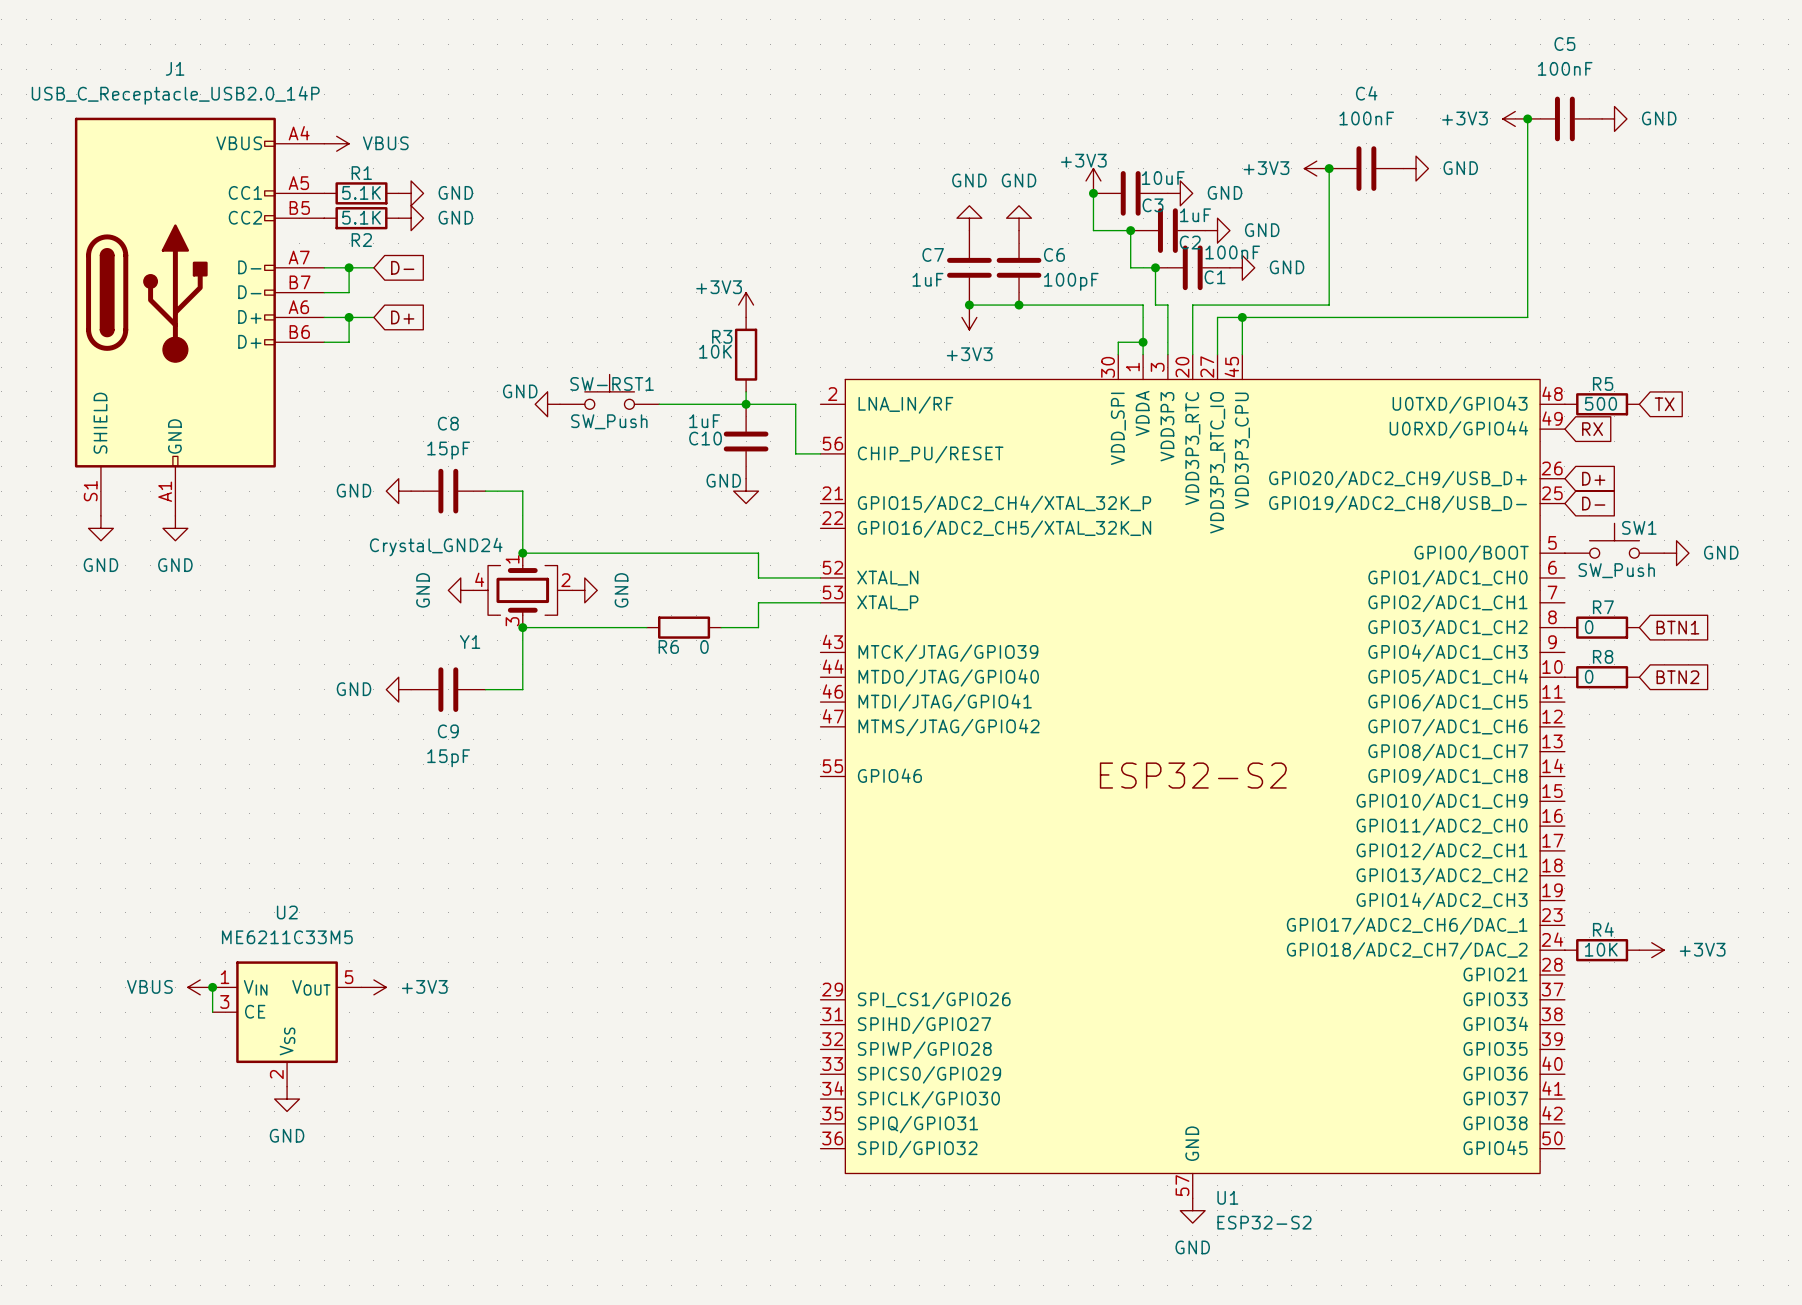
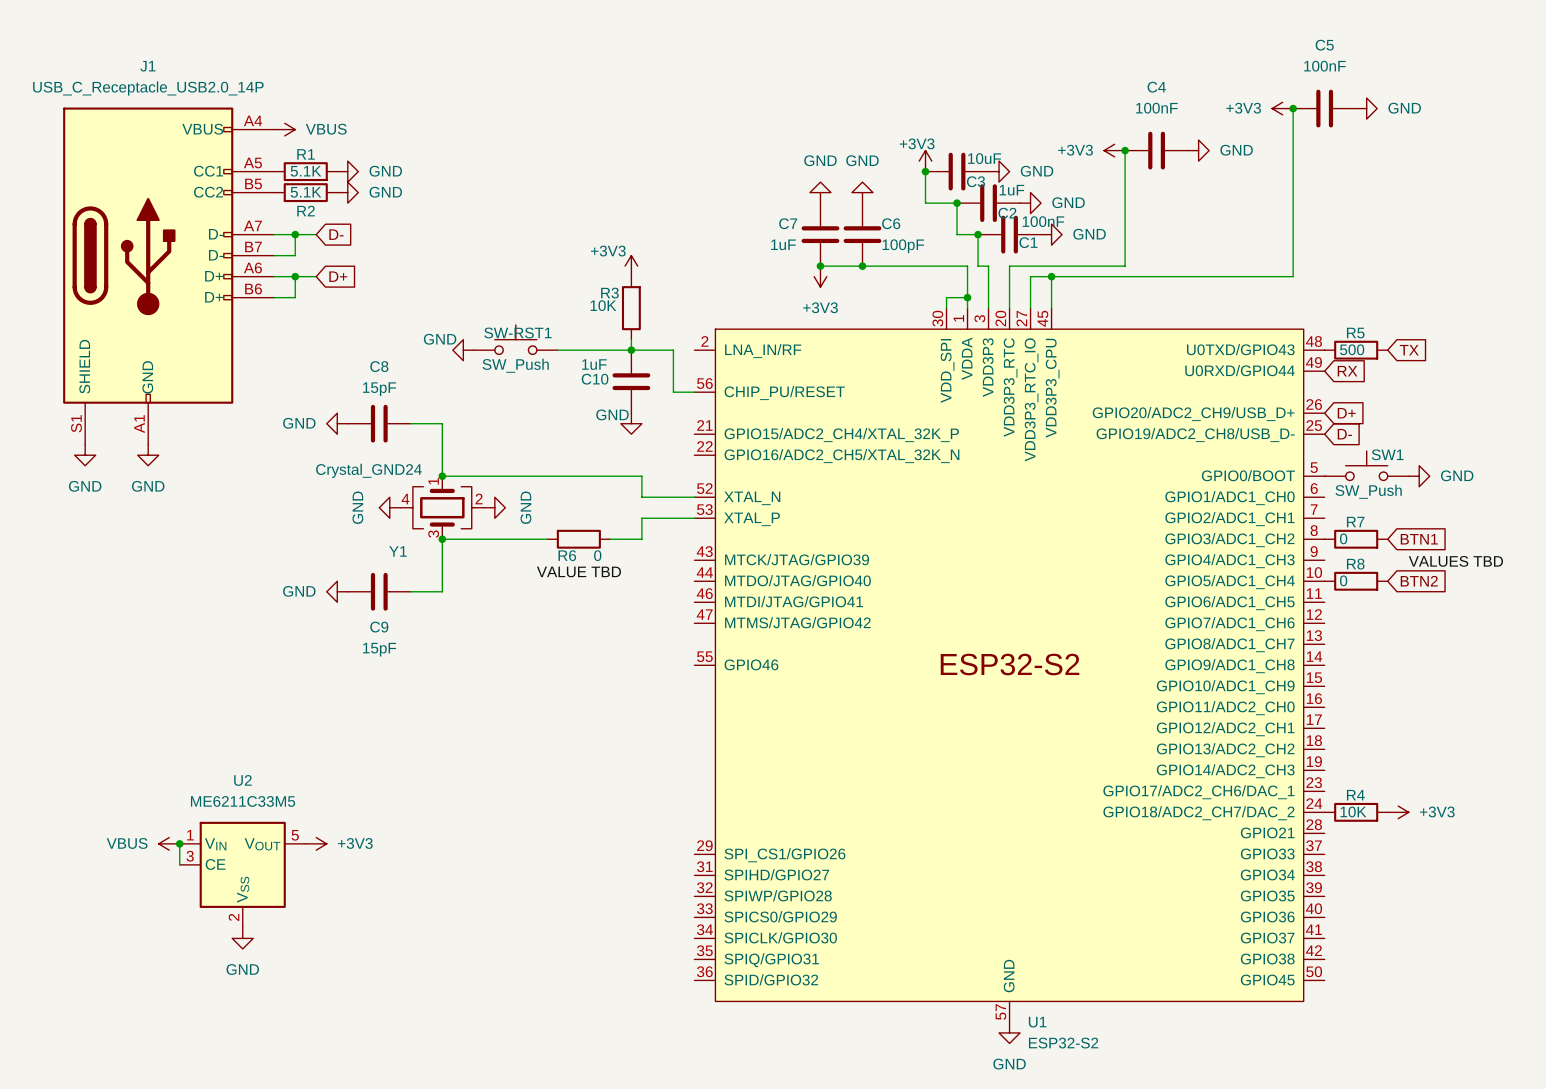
label: none -> VALUES TBD (1455, 561)
label: none -> VALUE TBD (578, 571)

